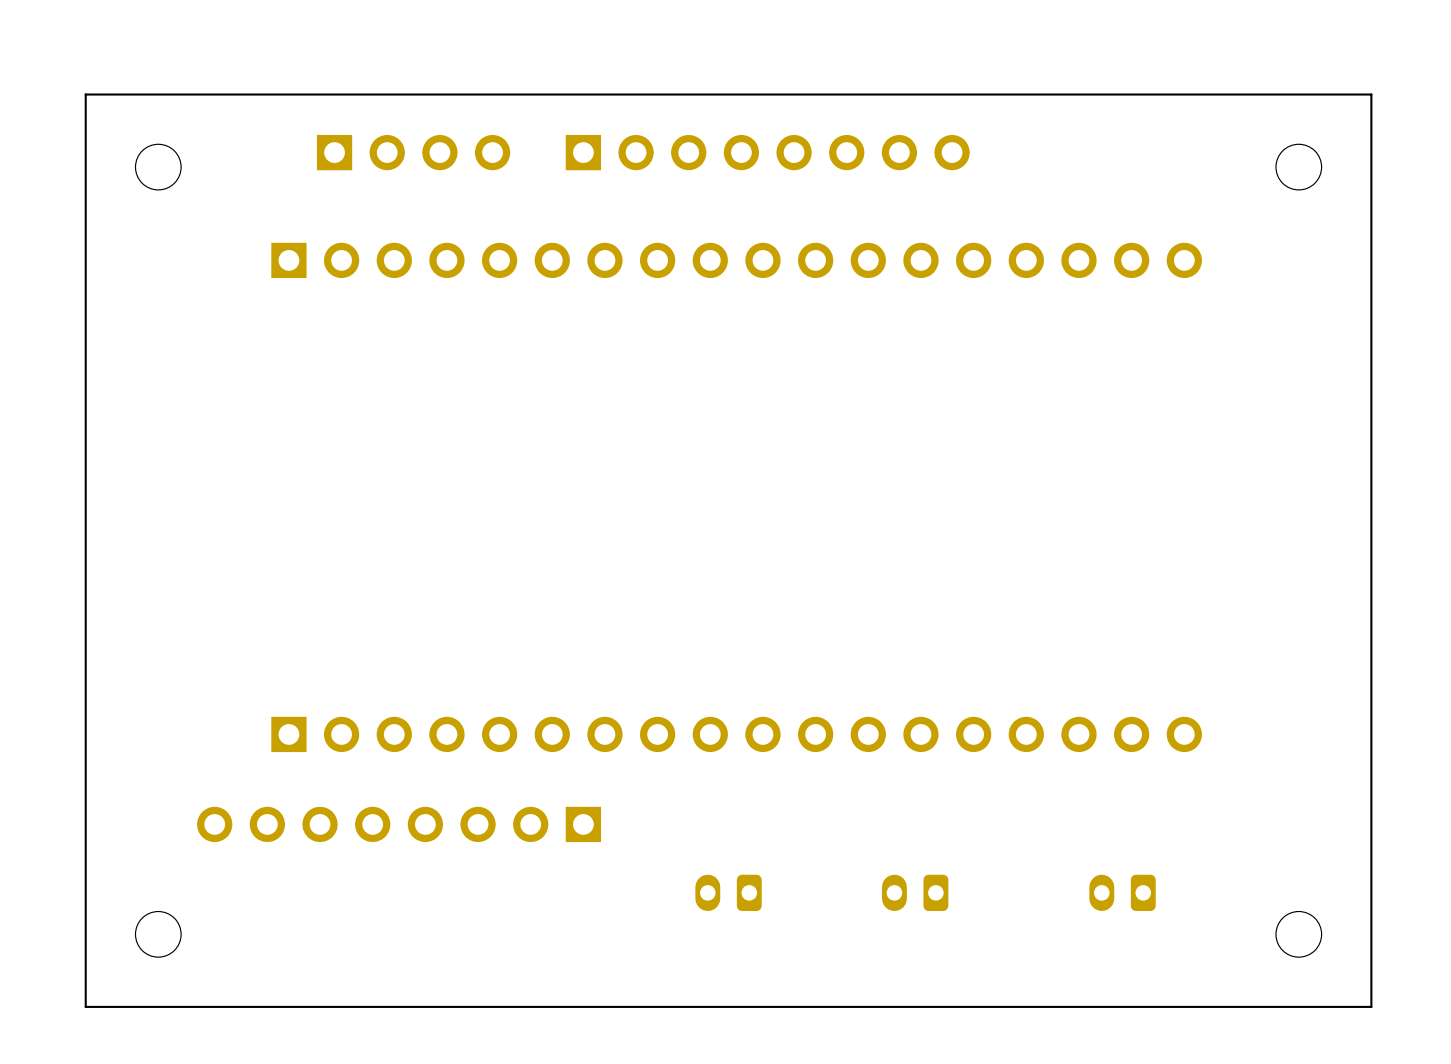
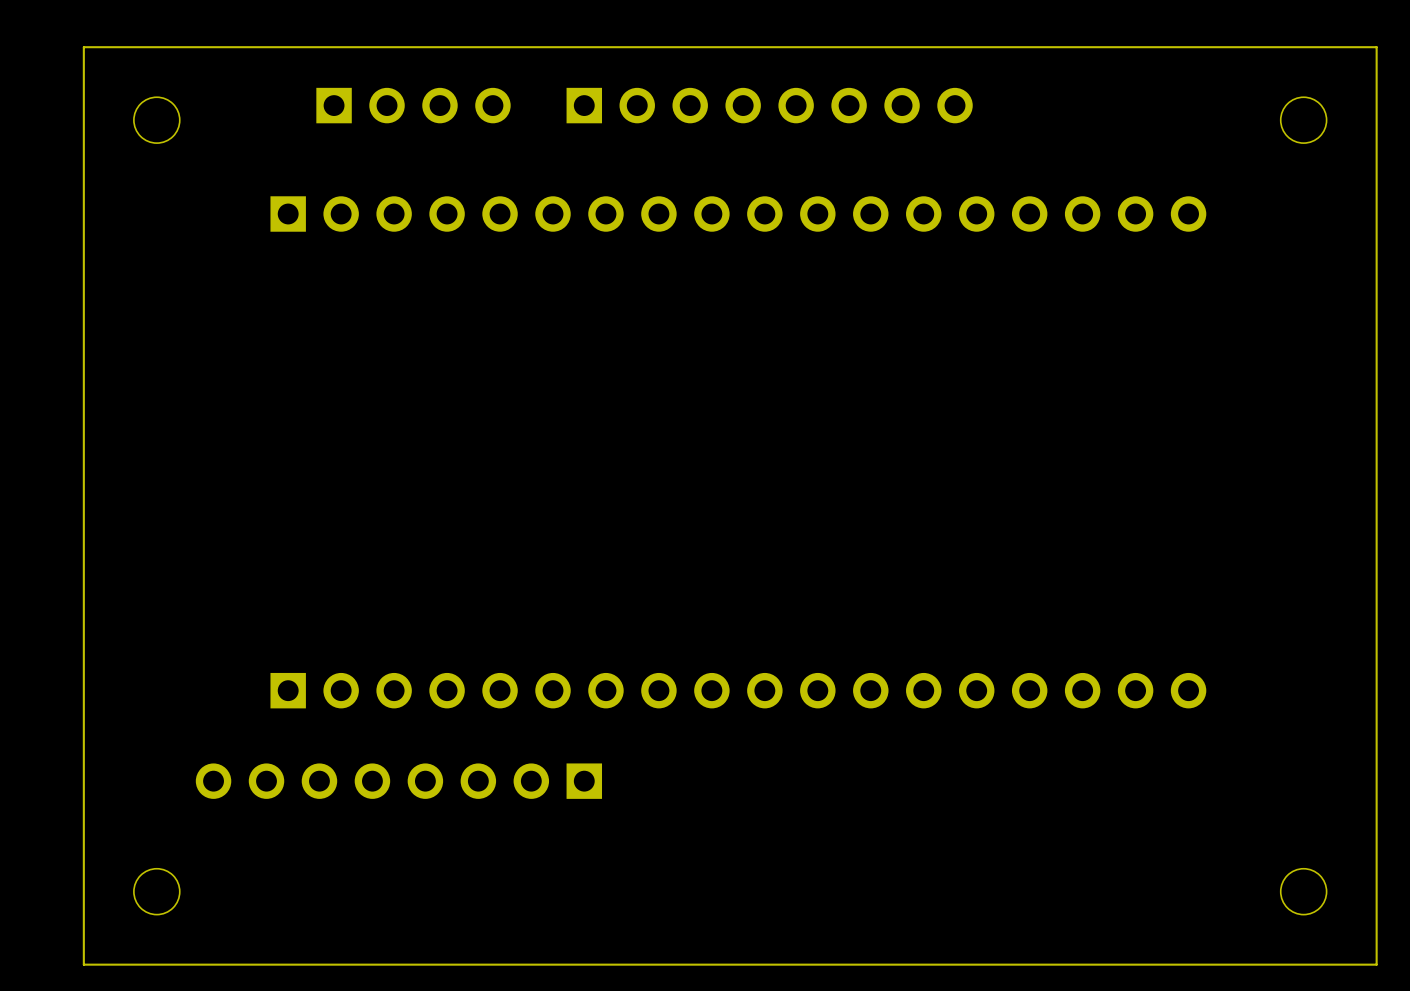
part: (728, 892) -> none
part: (915, 892) -> none
part: (1122, 892) -> none

